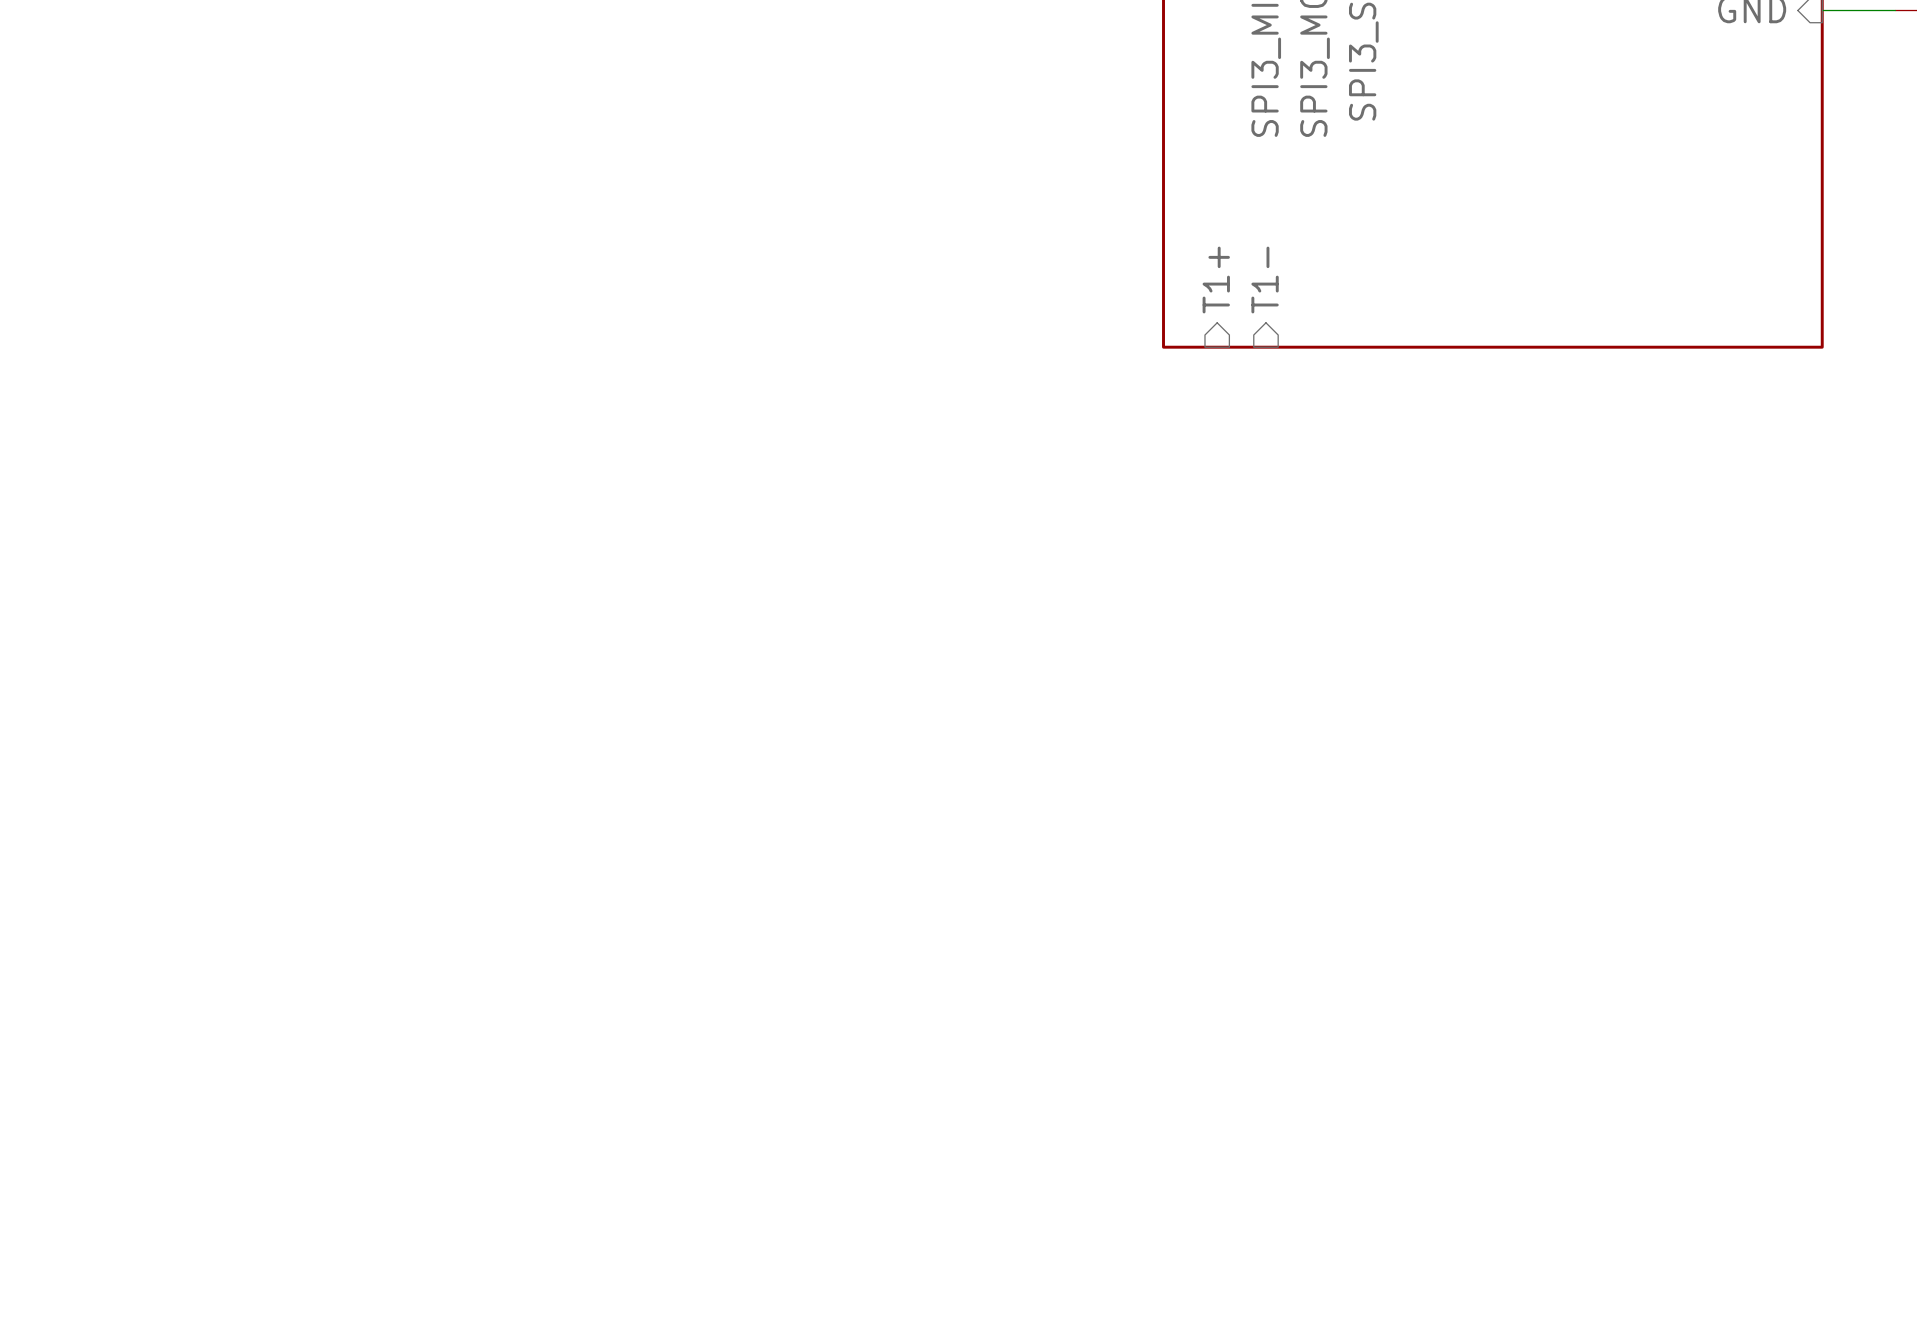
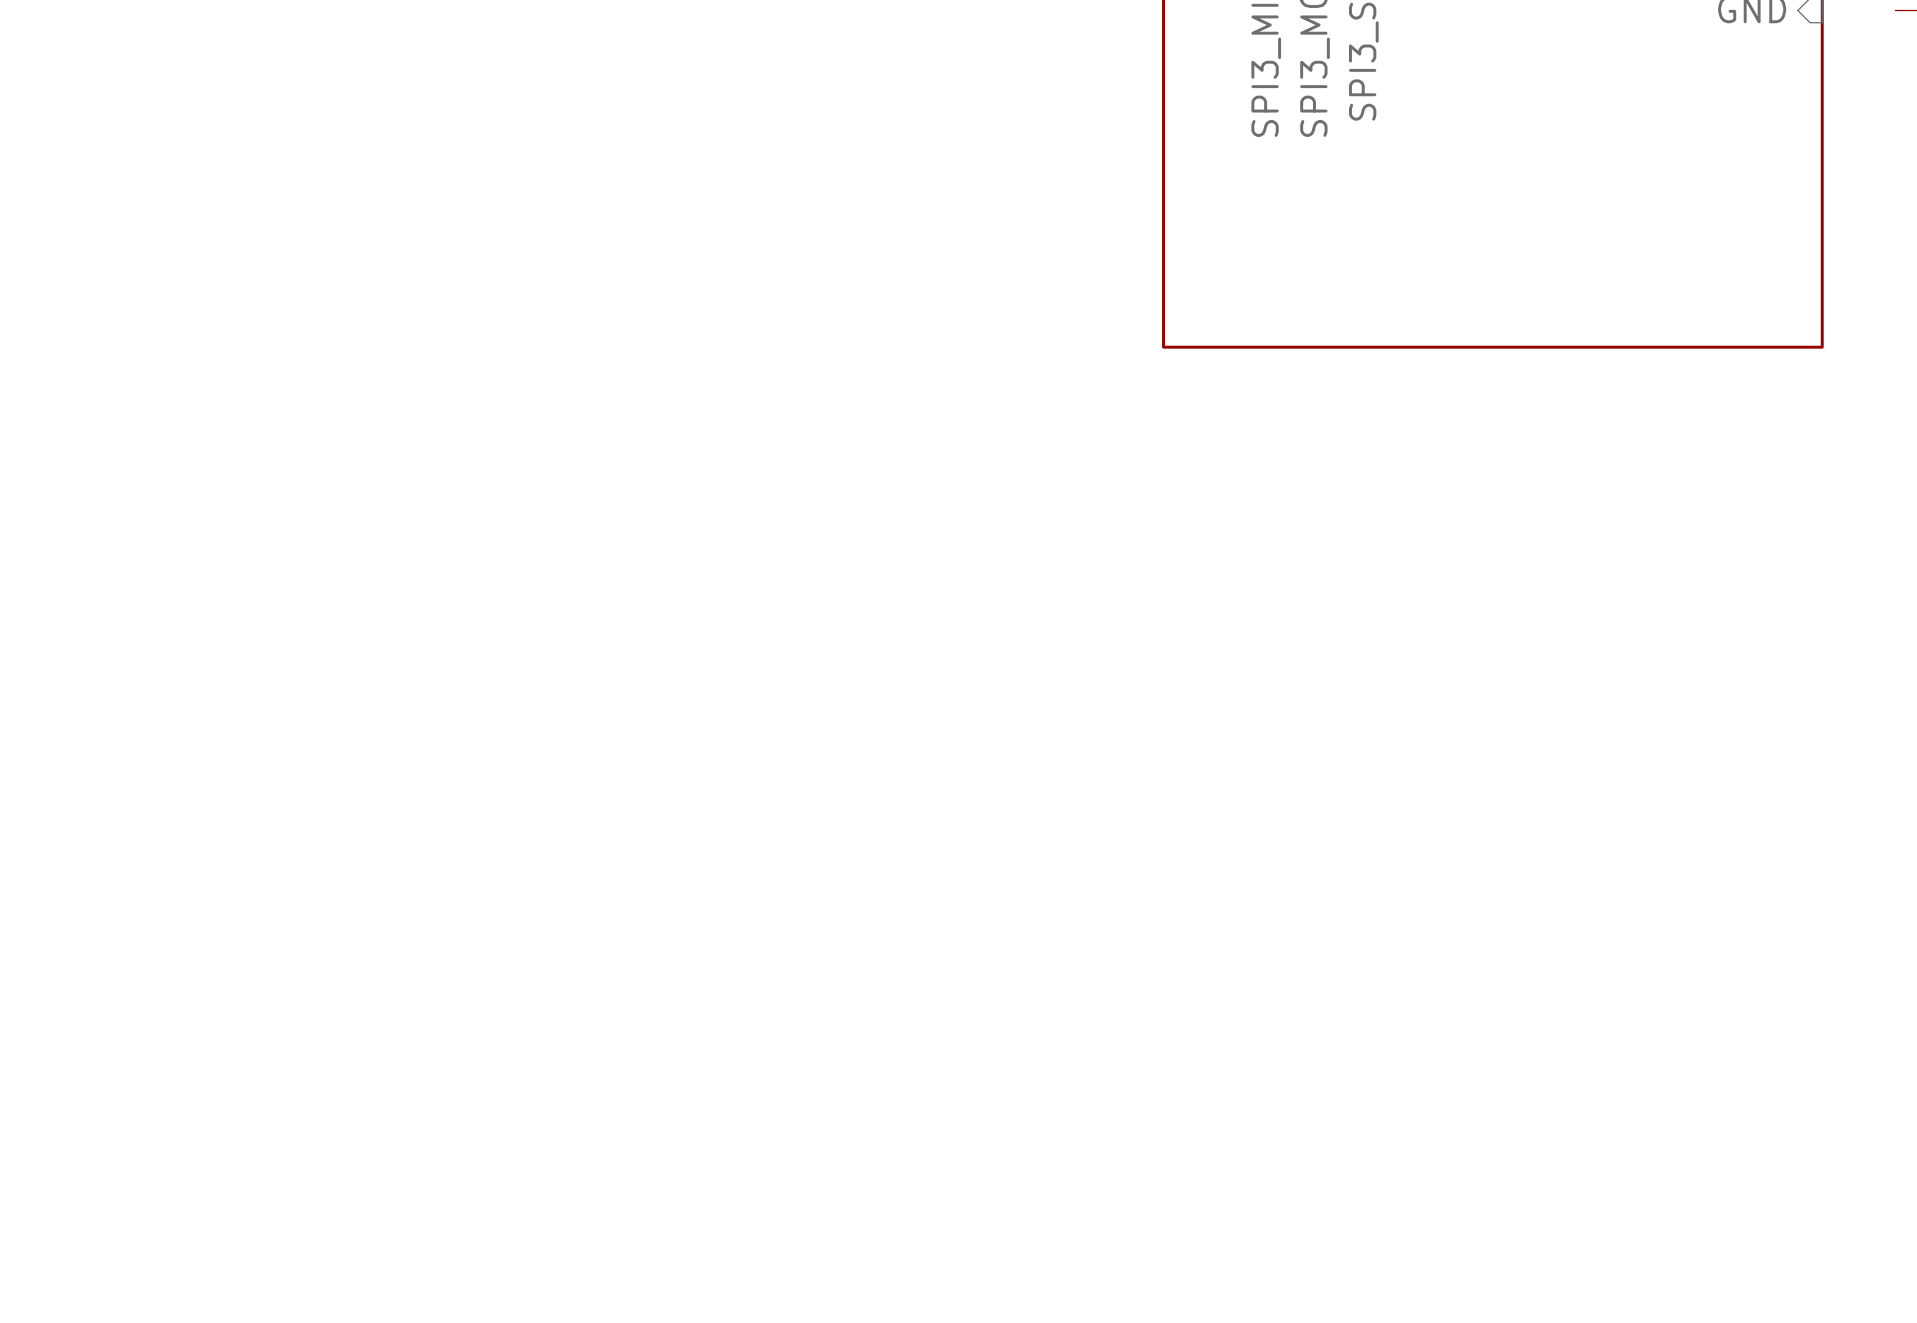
wire: (1822, 10) (1895, 10) -> none
sheet pin: T1+ (1216, 280) -> none
sheet pin: T1- (1265, 280) -> none

